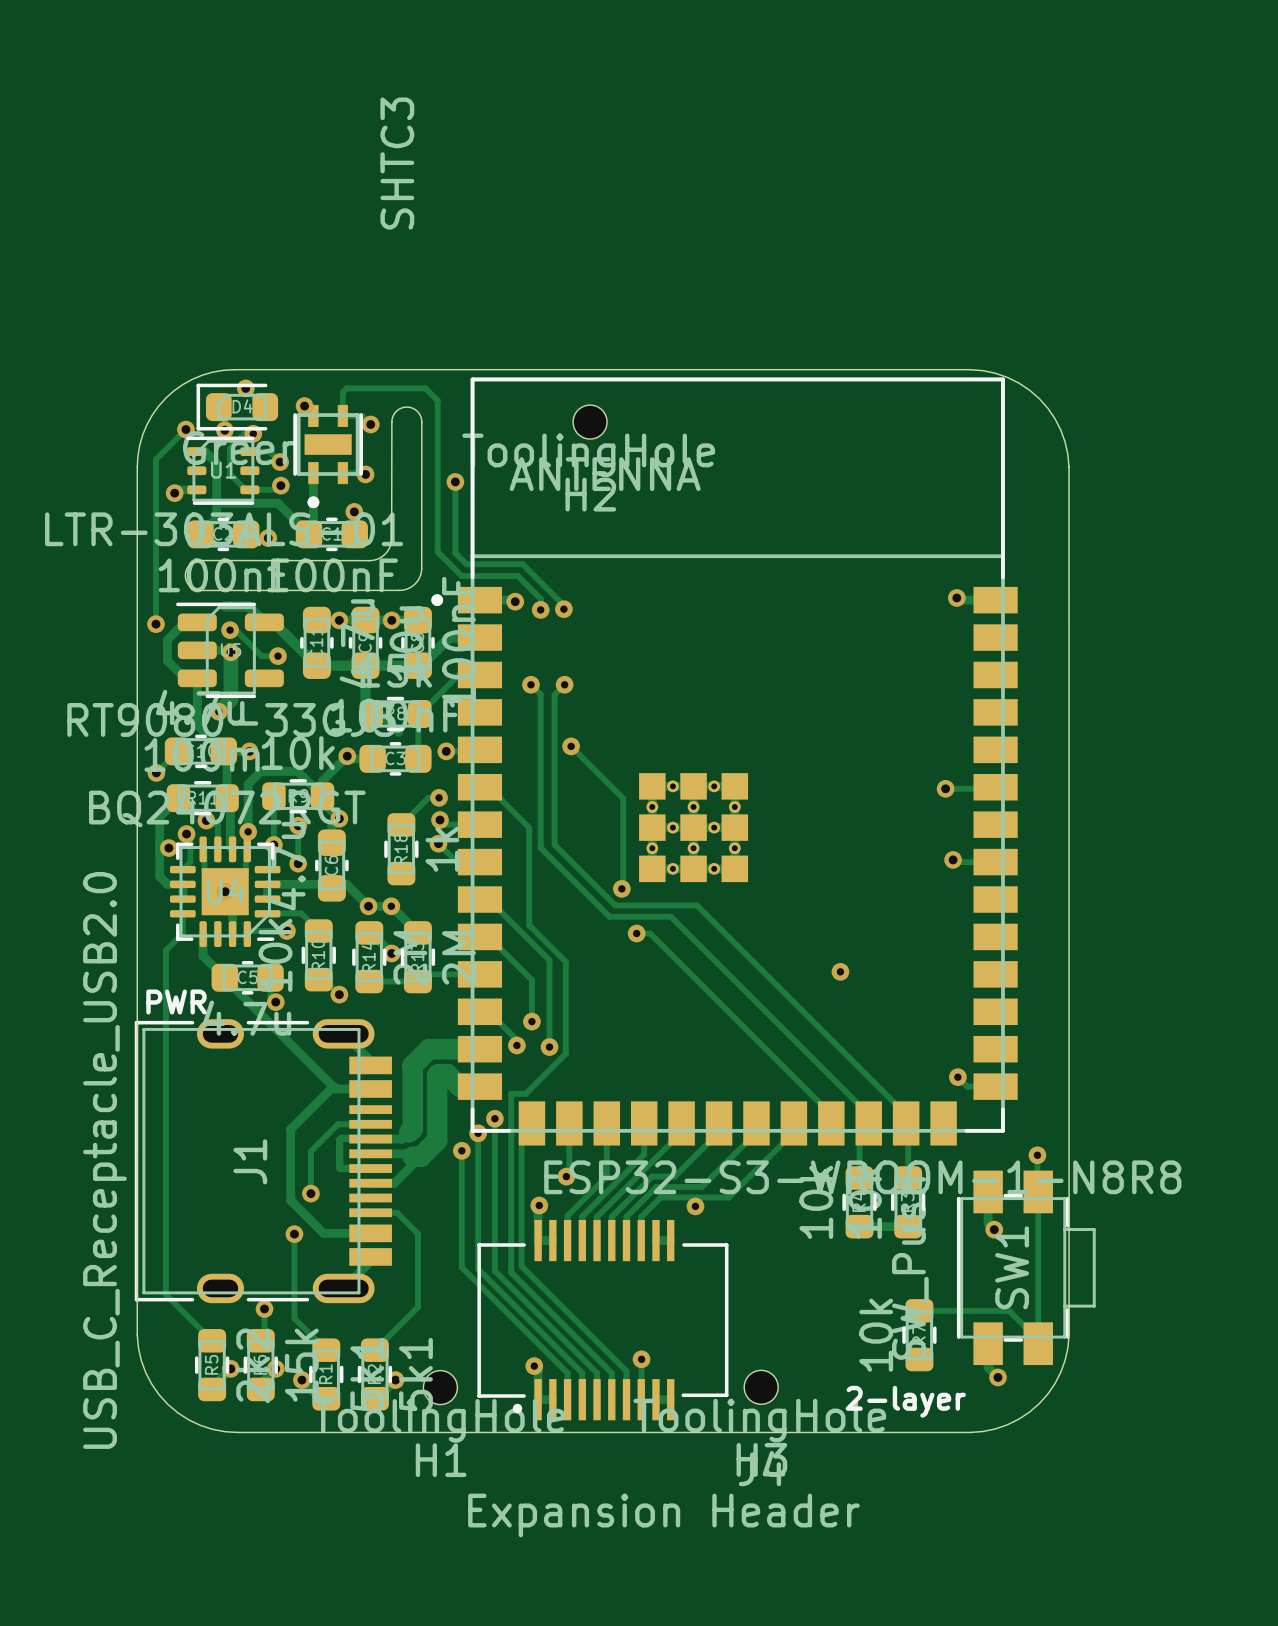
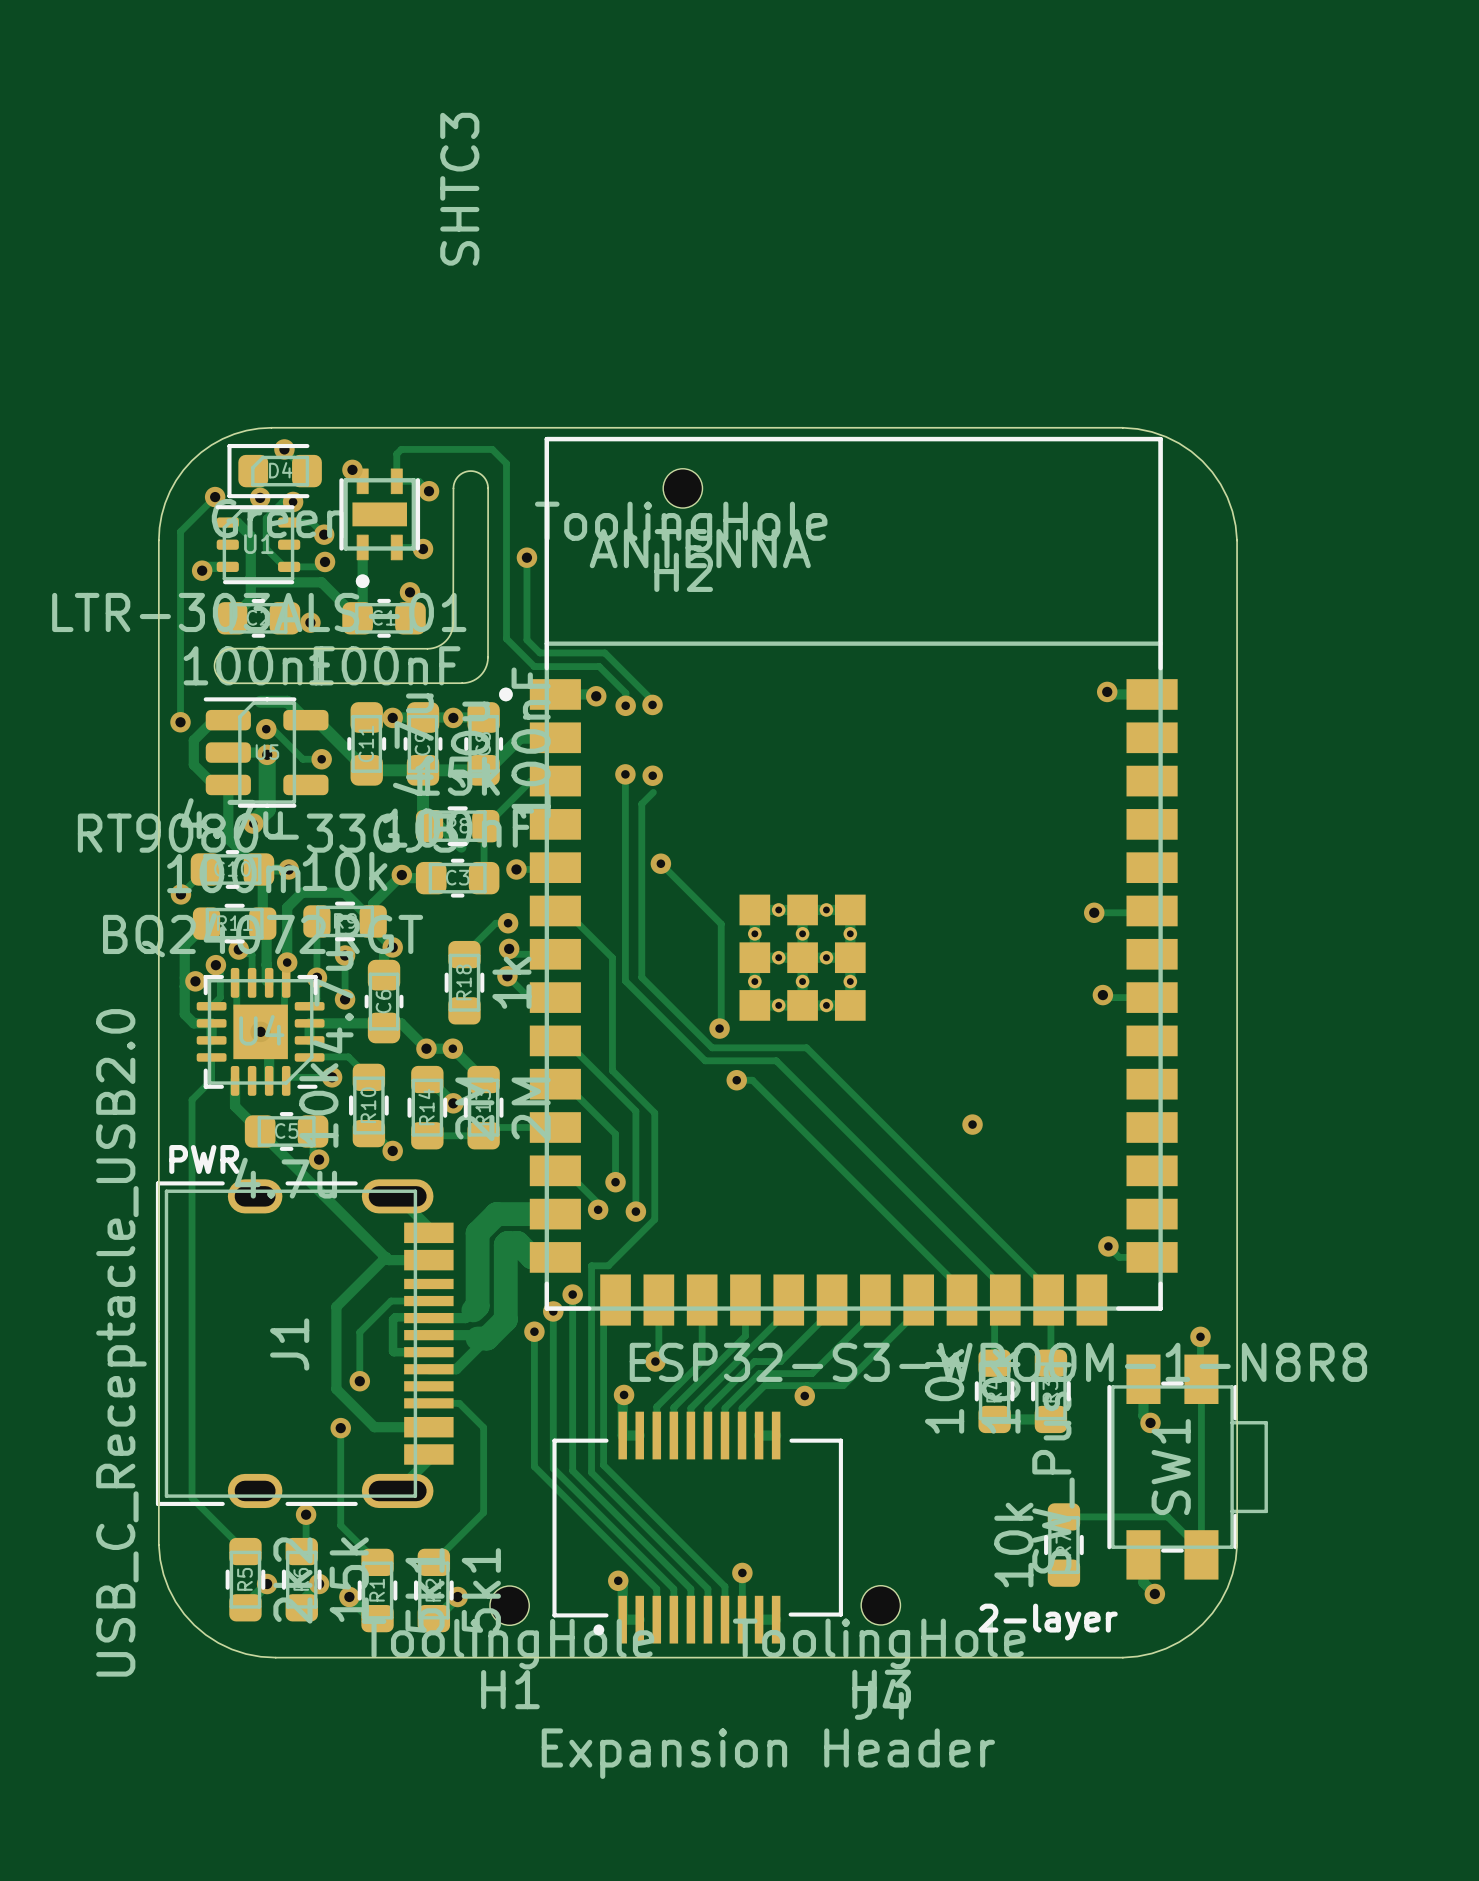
track: (530, 684) (540, 694) (540, 847) -> (625, 774) (625, 981)
via position: (530, 684) -> (625, 774)
via position: (564, 684) -> (652, 775)

